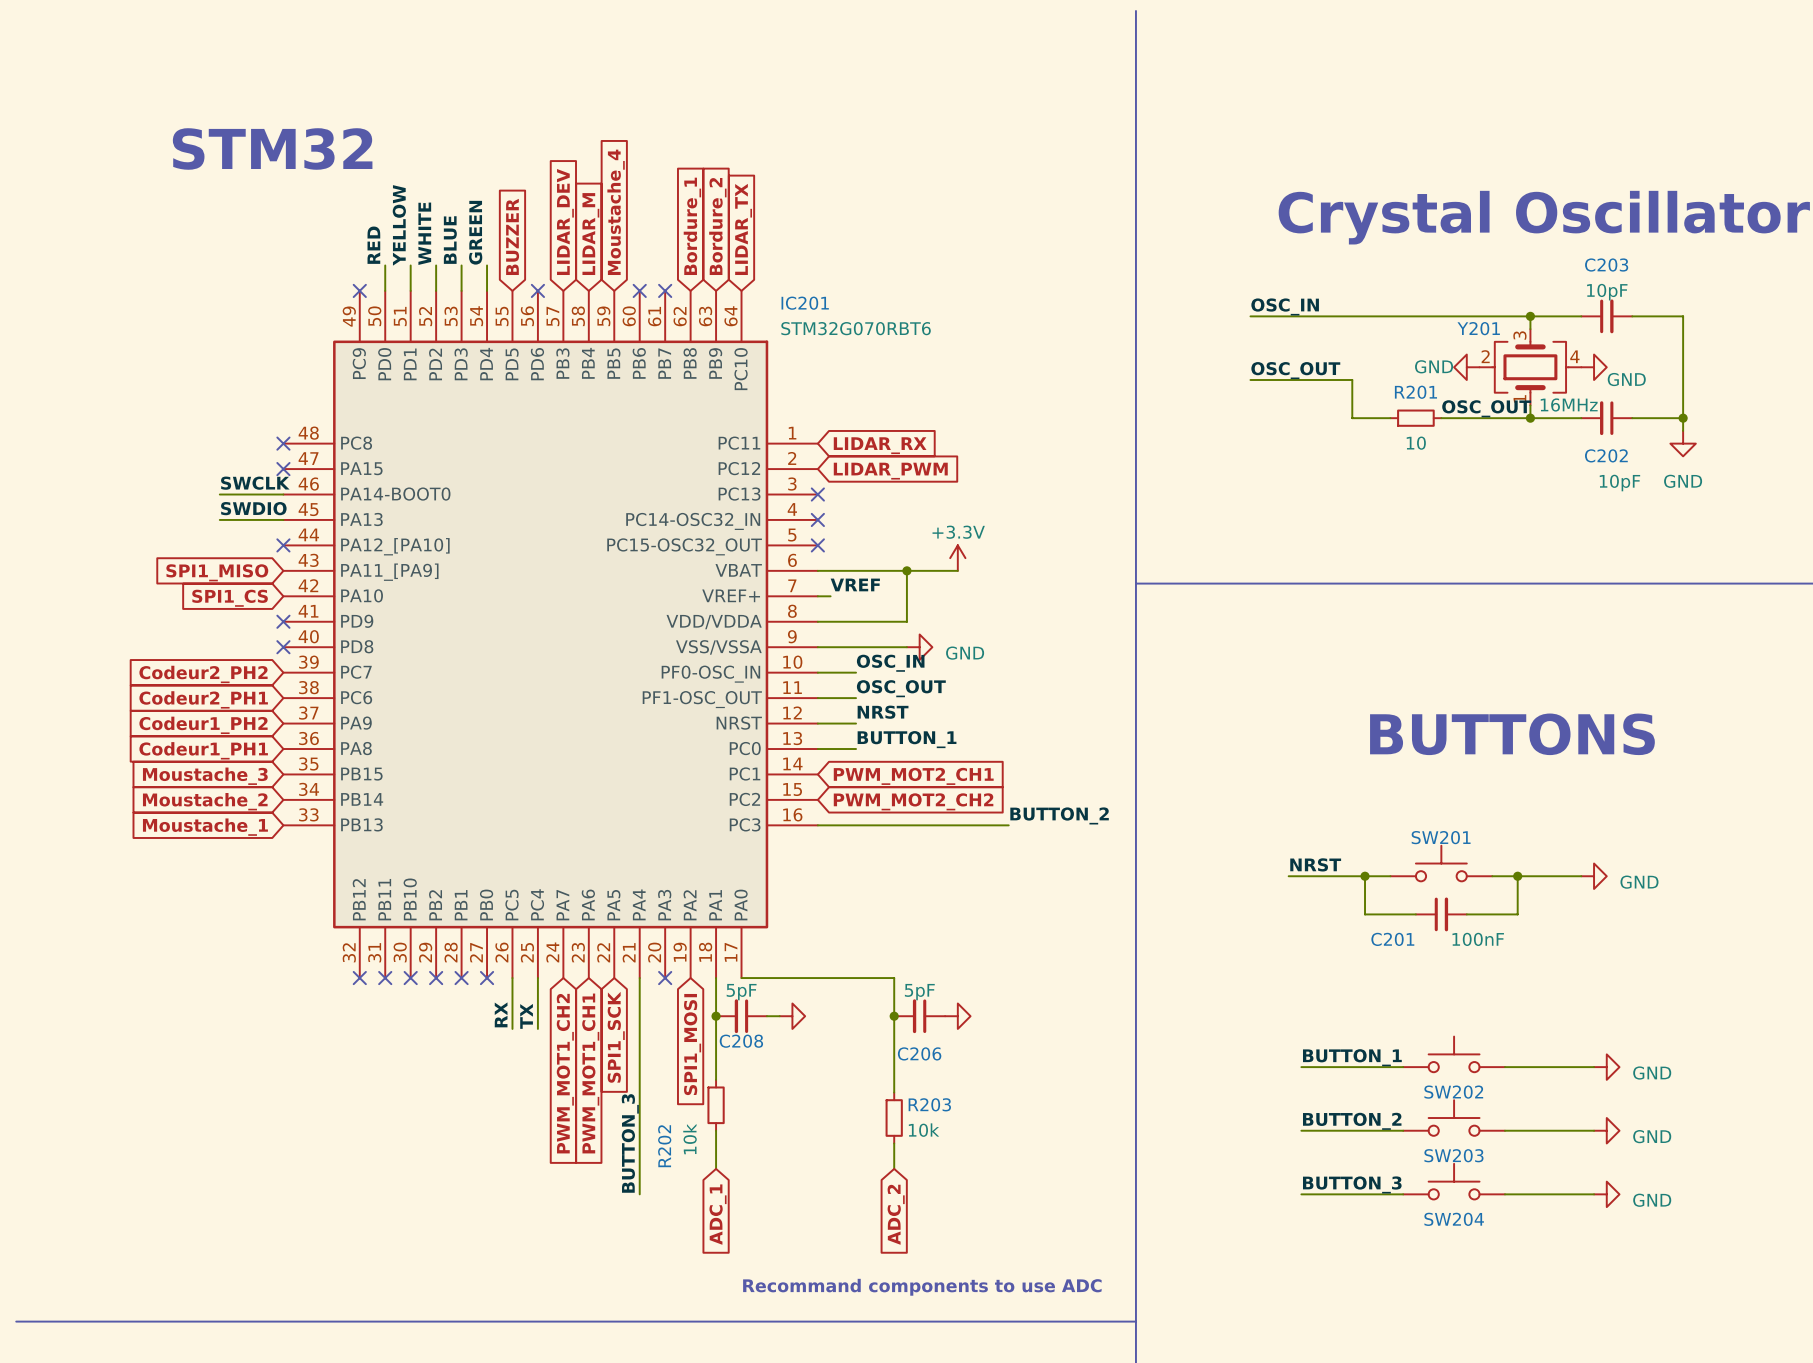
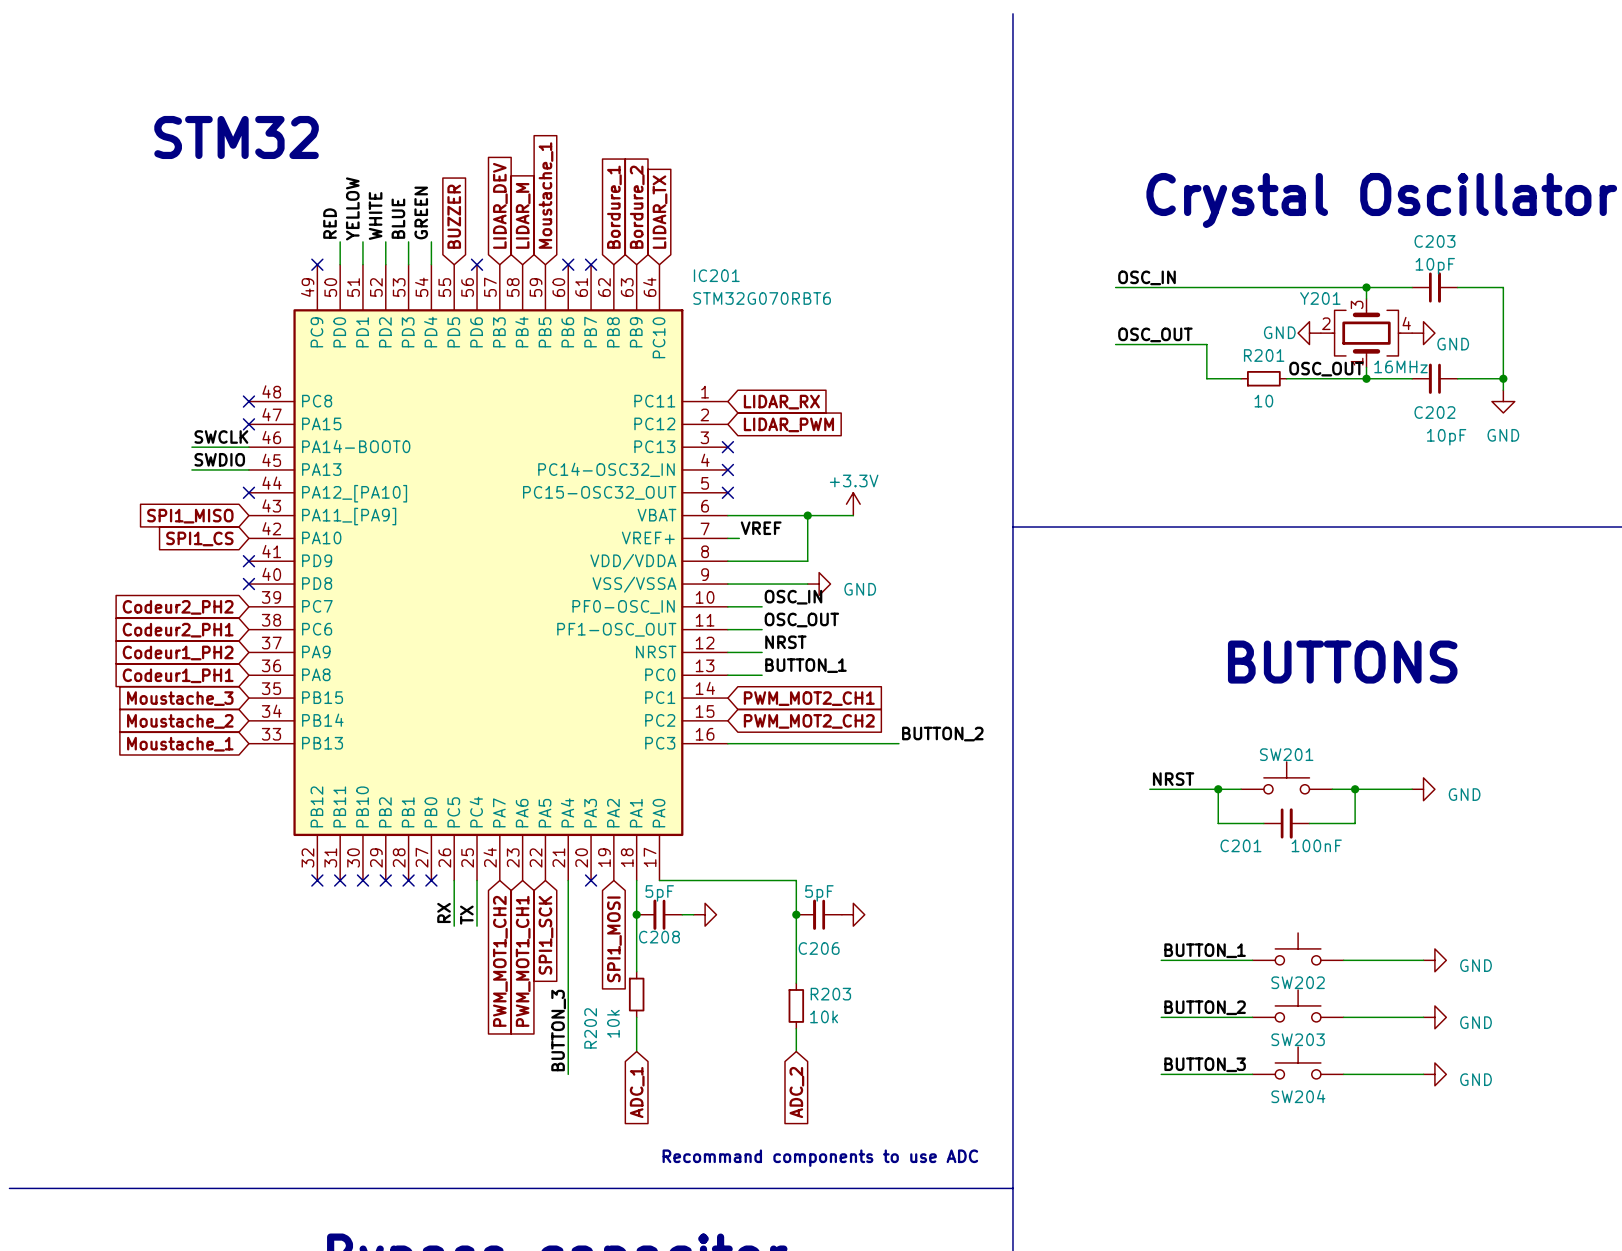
global label: Moustache_4 (616, 212) -> Moustache_1 (545, 195)

